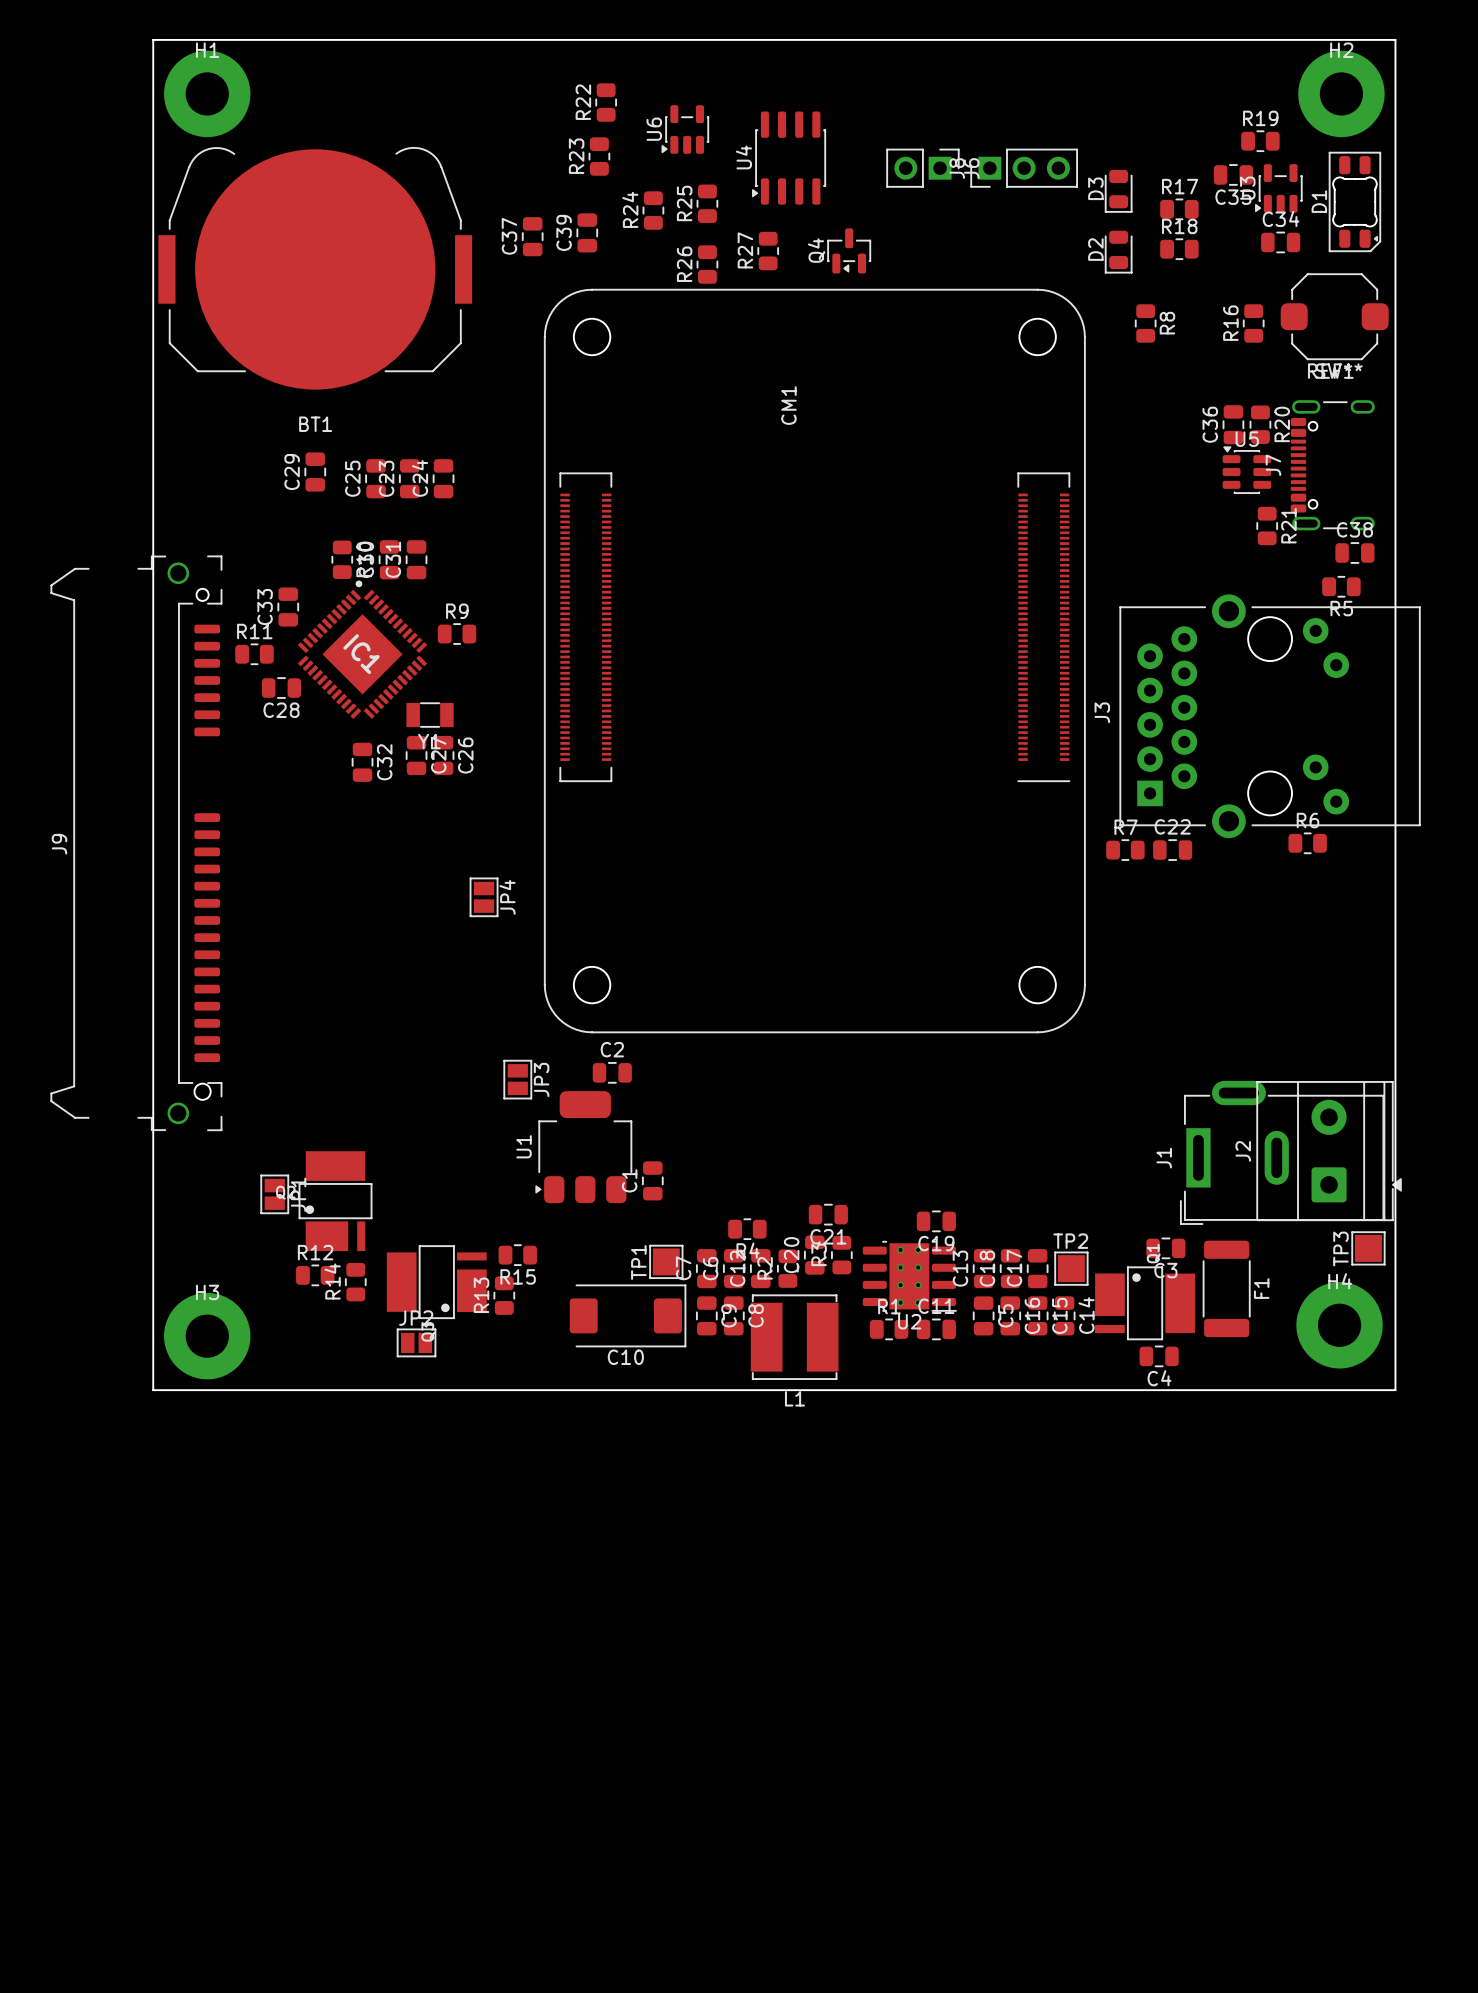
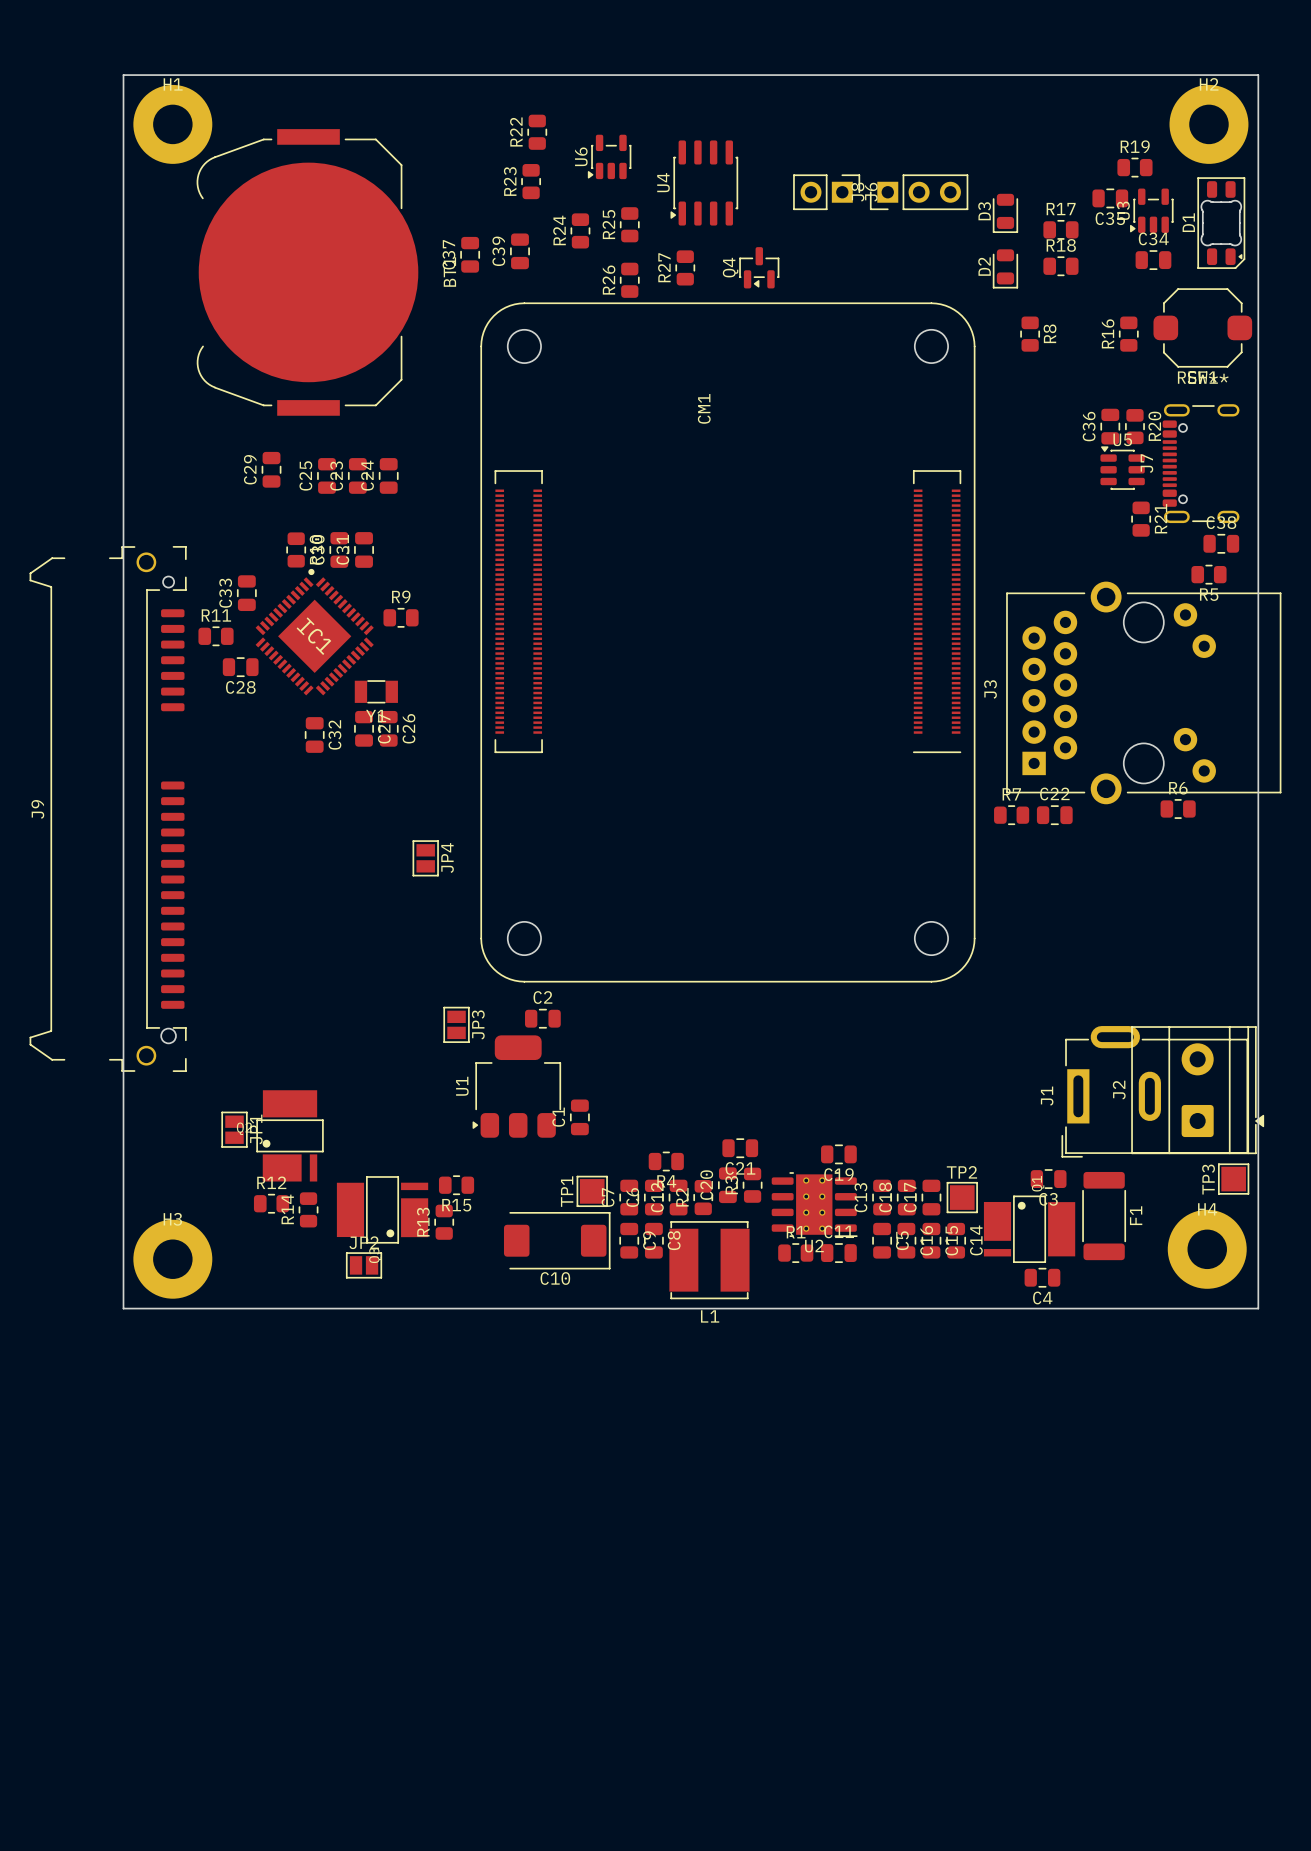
BT1 rotation: 0° (315, 268) -> 90° counterclockwise (307, 272)

